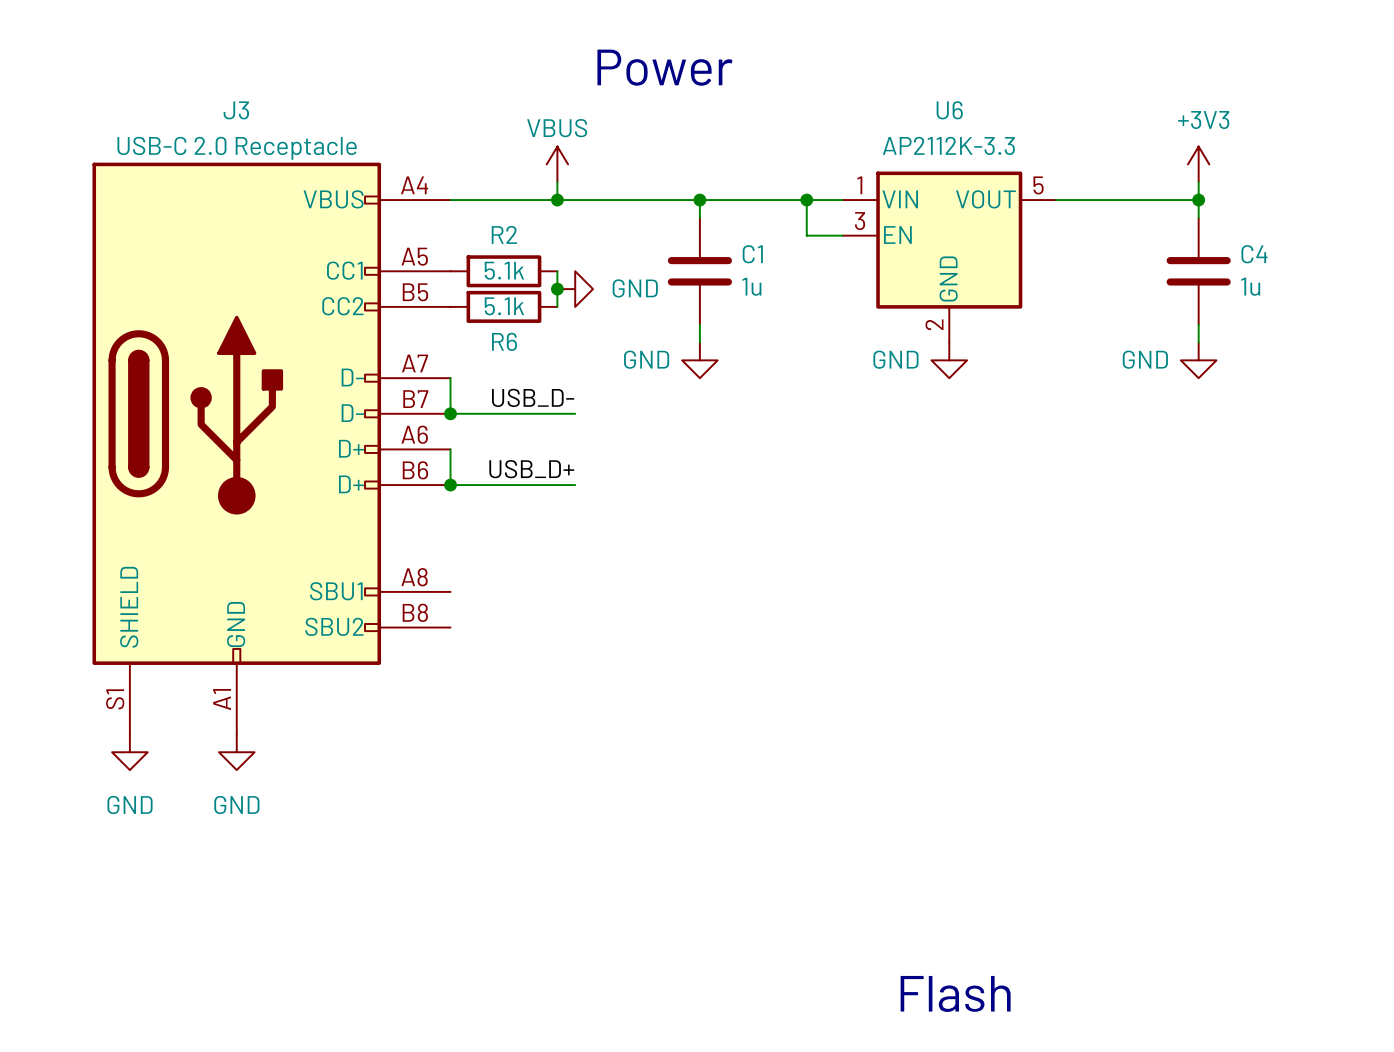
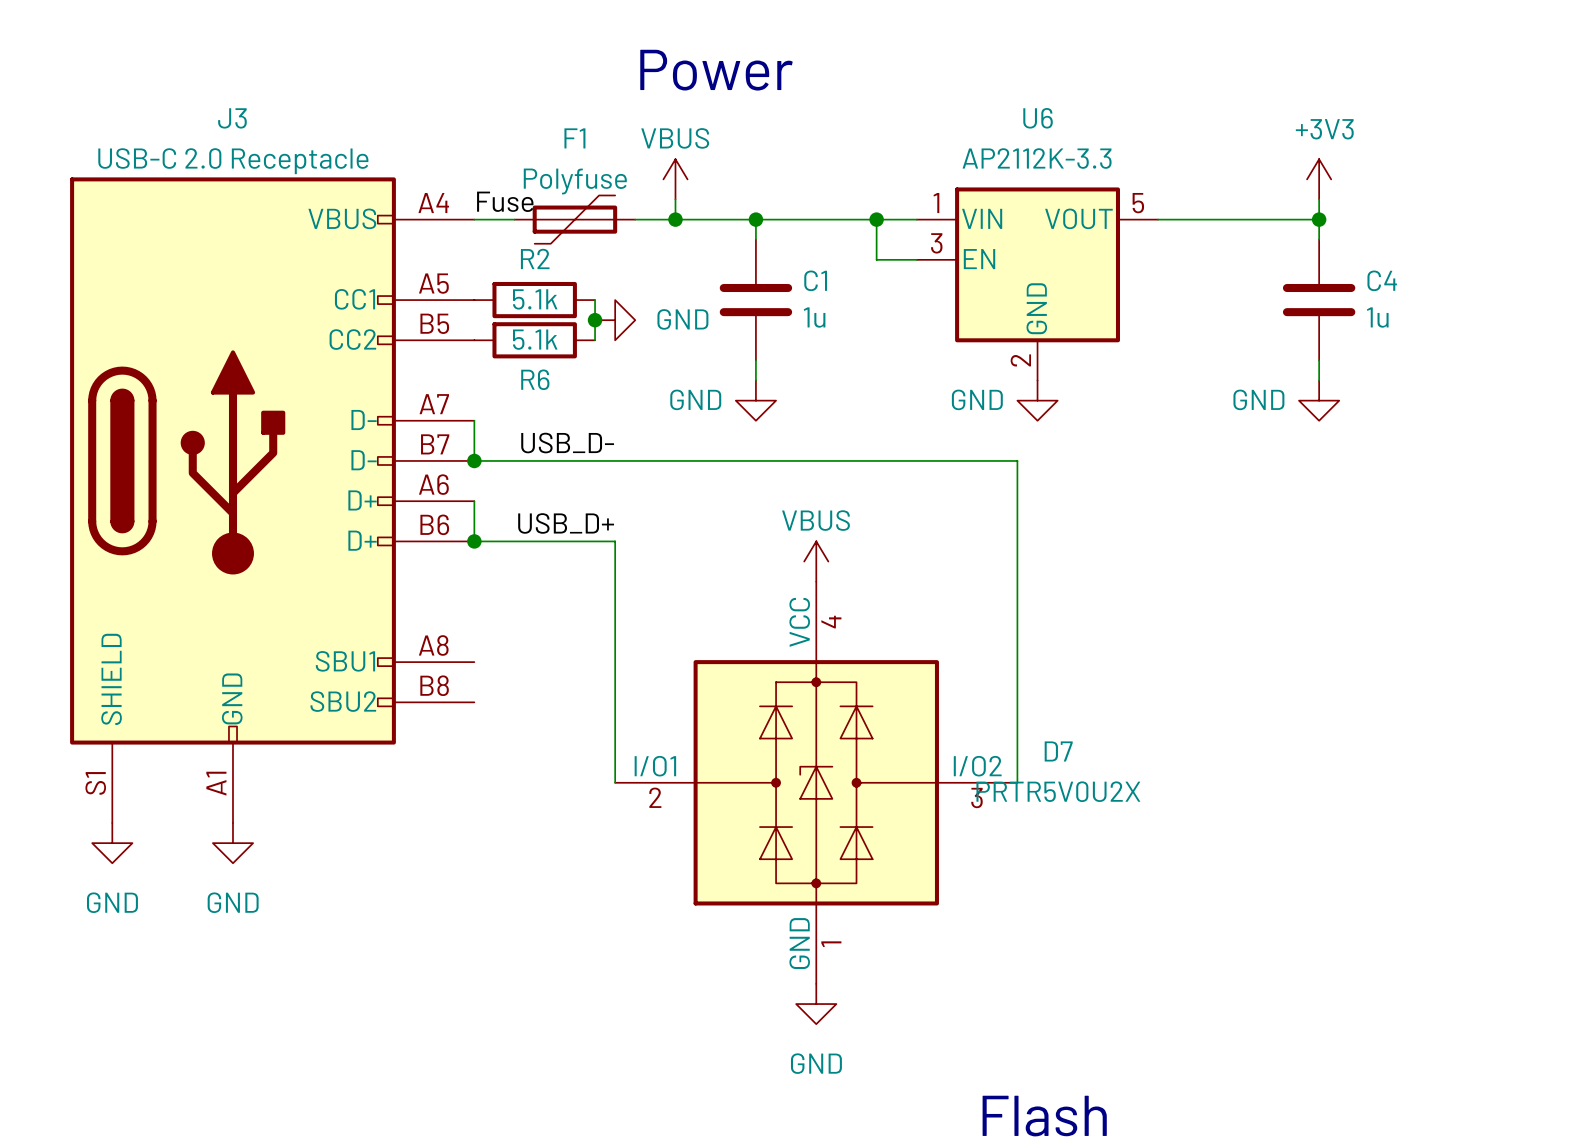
power symbol position: VBUS (557, 164) -> VBUS (675, 179)
wire: (557, 182) (557, 200) -> (675, 199) (675, 219)
label: none -> Fuse (505, 201)
F1: none -> Polyfuse (574, 219)
junction position: (557, 200) -> (675, 219)
wire: none -> (615, 460) (1017, 460) (1017, 782)
wire: none -> (615, 541) (615, 782)
power symbol: none -> VBUS (816, 561)
D7: none -> PRTR5V0U2X (816, 782)
power symbol: none -> GND (816, 1004)

